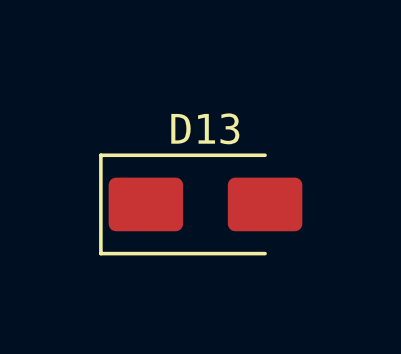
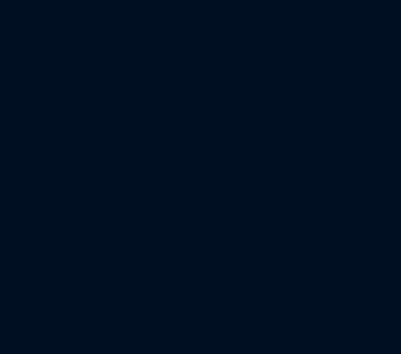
D13: (200, 204) -> none

